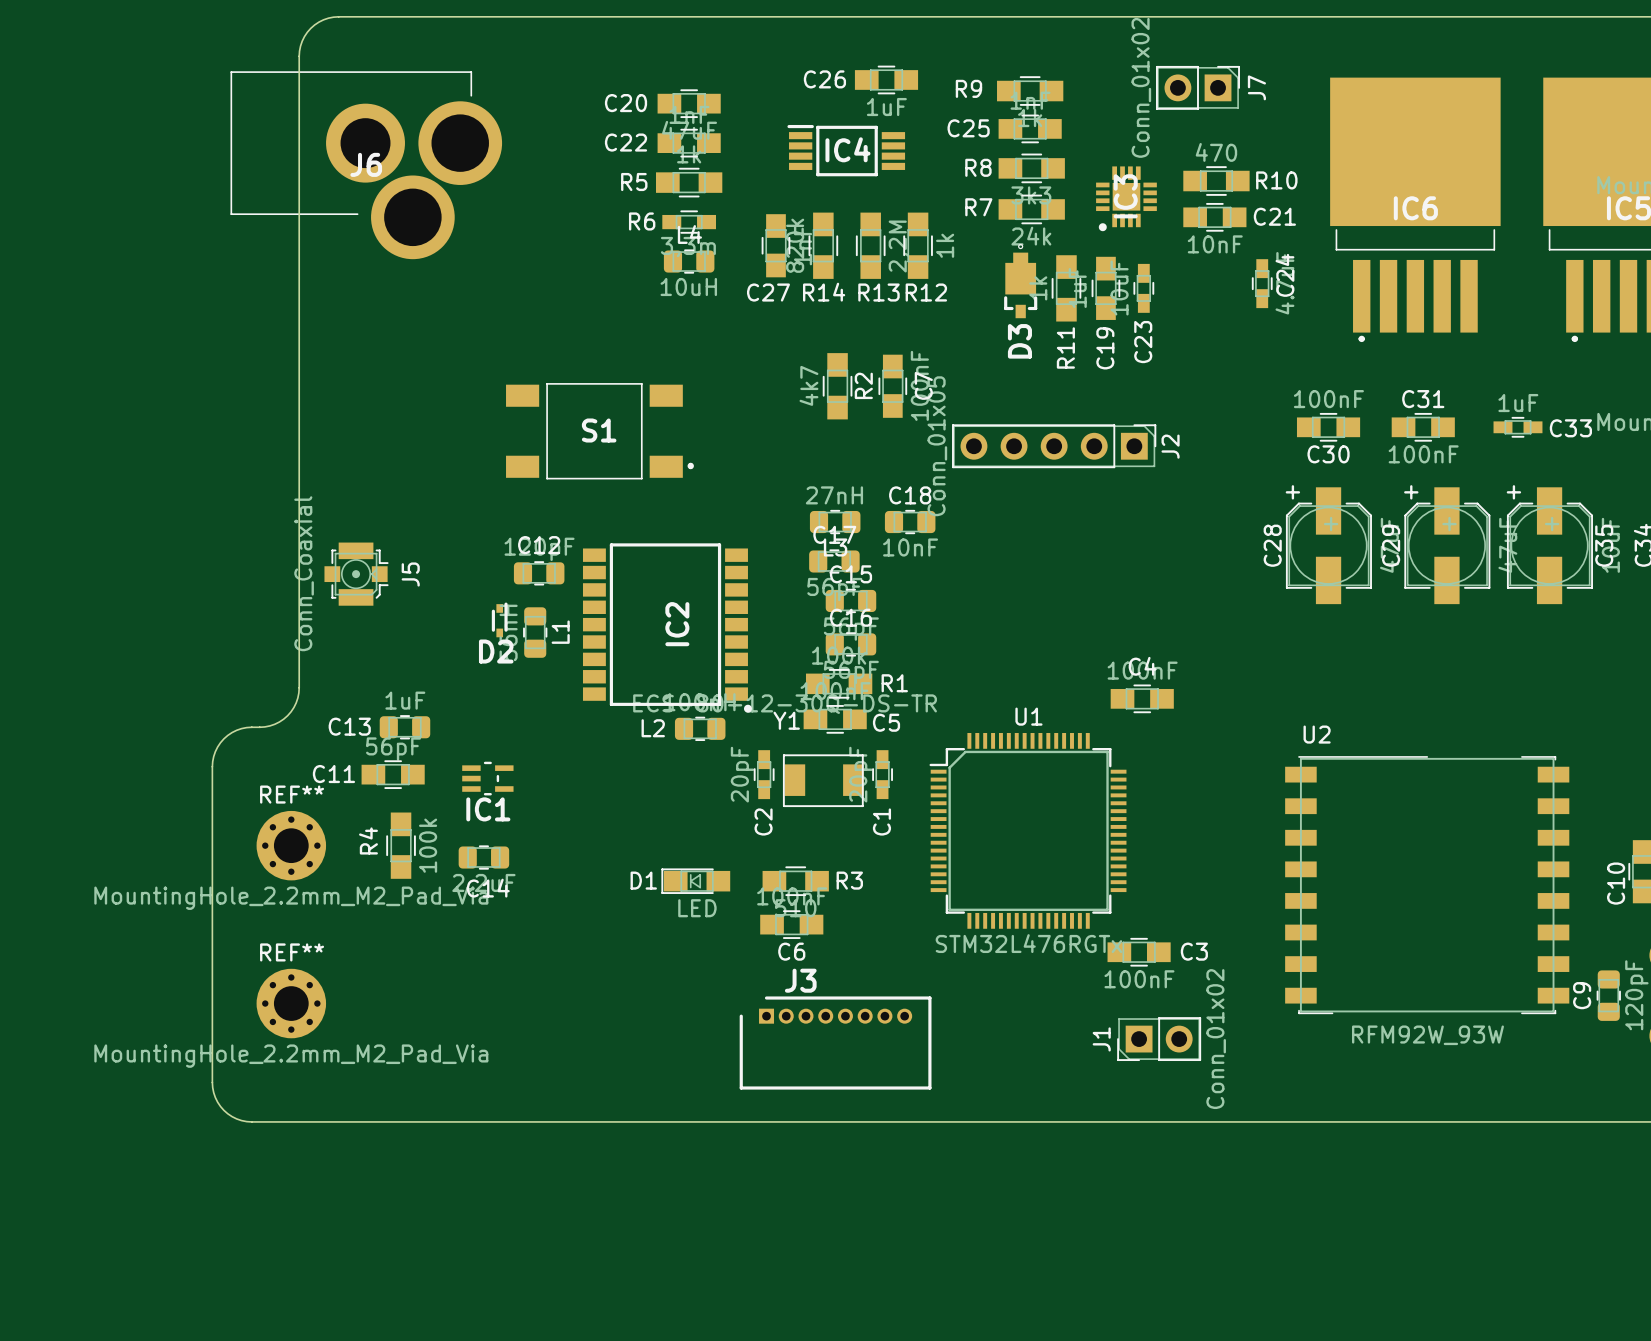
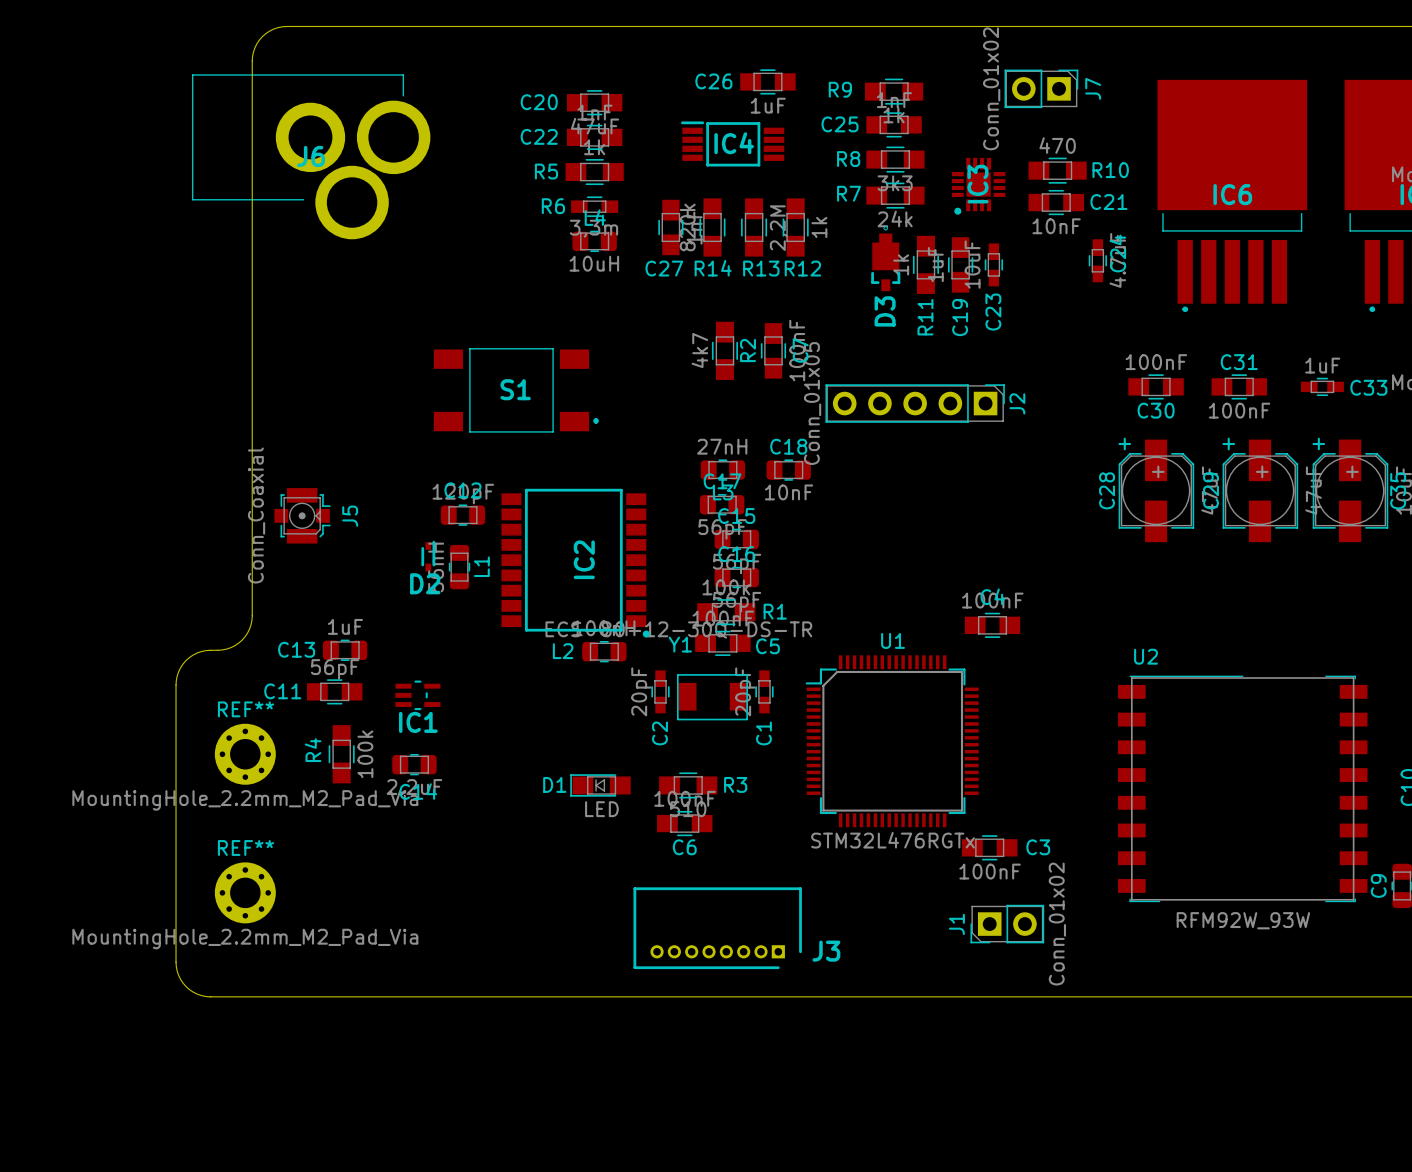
J3 name position: J3 (800, 980) -> J3 (826, 951)
J3 rotation: 0° (835, 1043) -> 180° (717, 928)

